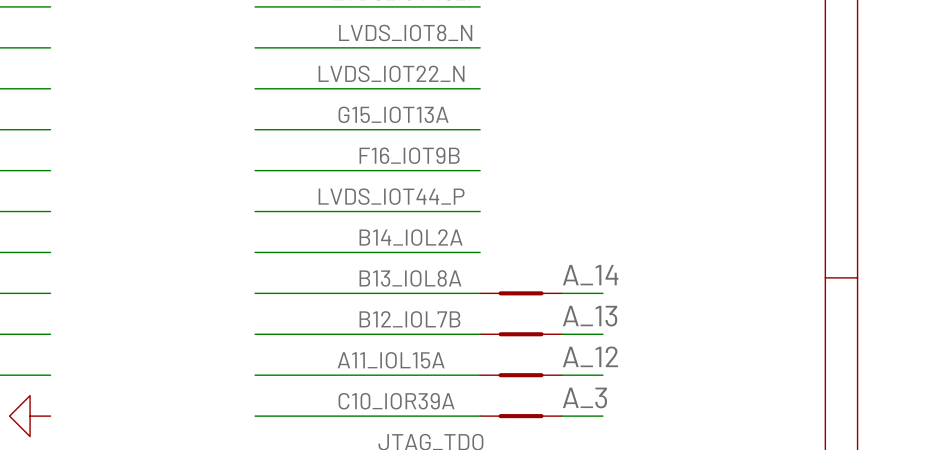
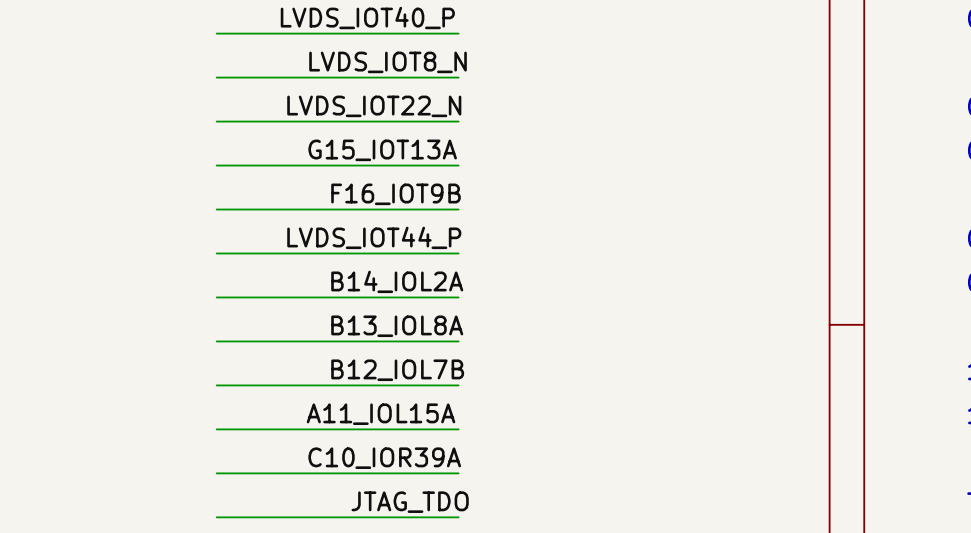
label: A_14 (590, 275) -> none
part: (521, 293) -> none
wire: (561, 293) (602, 293) -> none
label: A_13 (590, 316) -> none
part: (521, 334) -> none
wire: (561, 334) (602, 334) -> none
label: A_12 (590, 356) -> none
part: (521, 375) -> none
wire: (561, 375) (602, 375) -> none
label: A_3 (584, 397) -> none
part: (521, 416) -> none
wire: (561, 416) (602, 416) -> none

